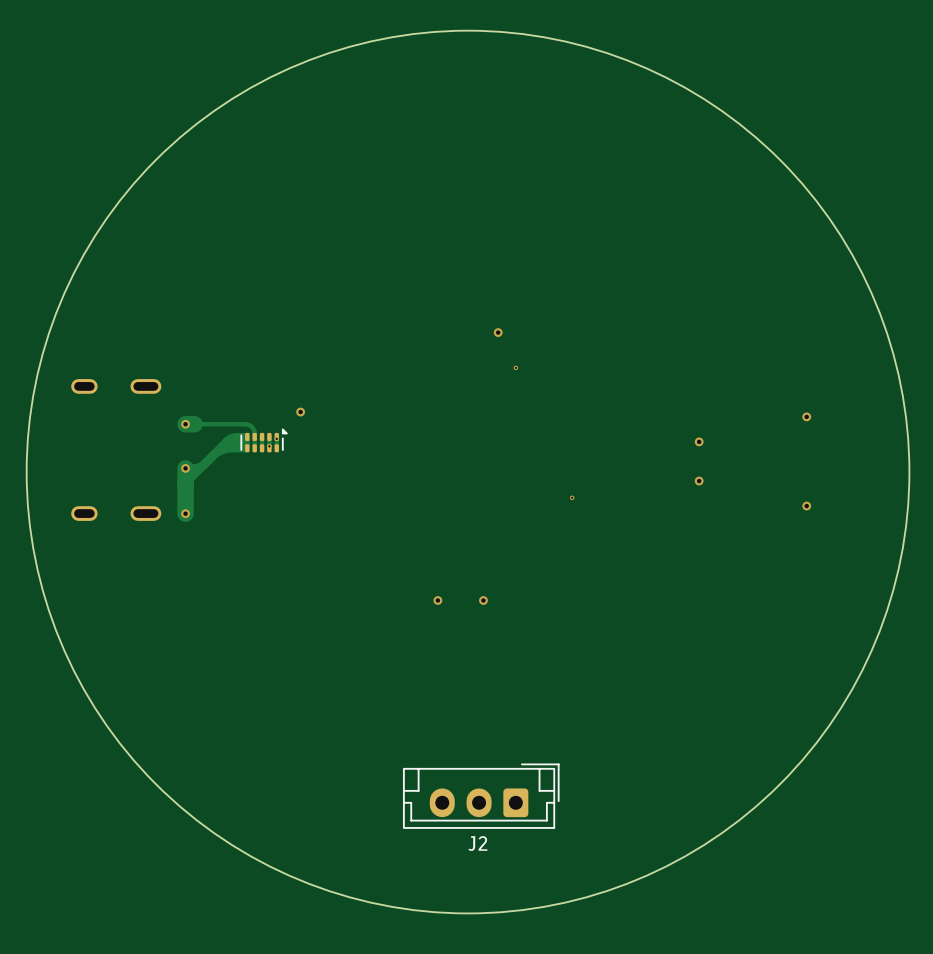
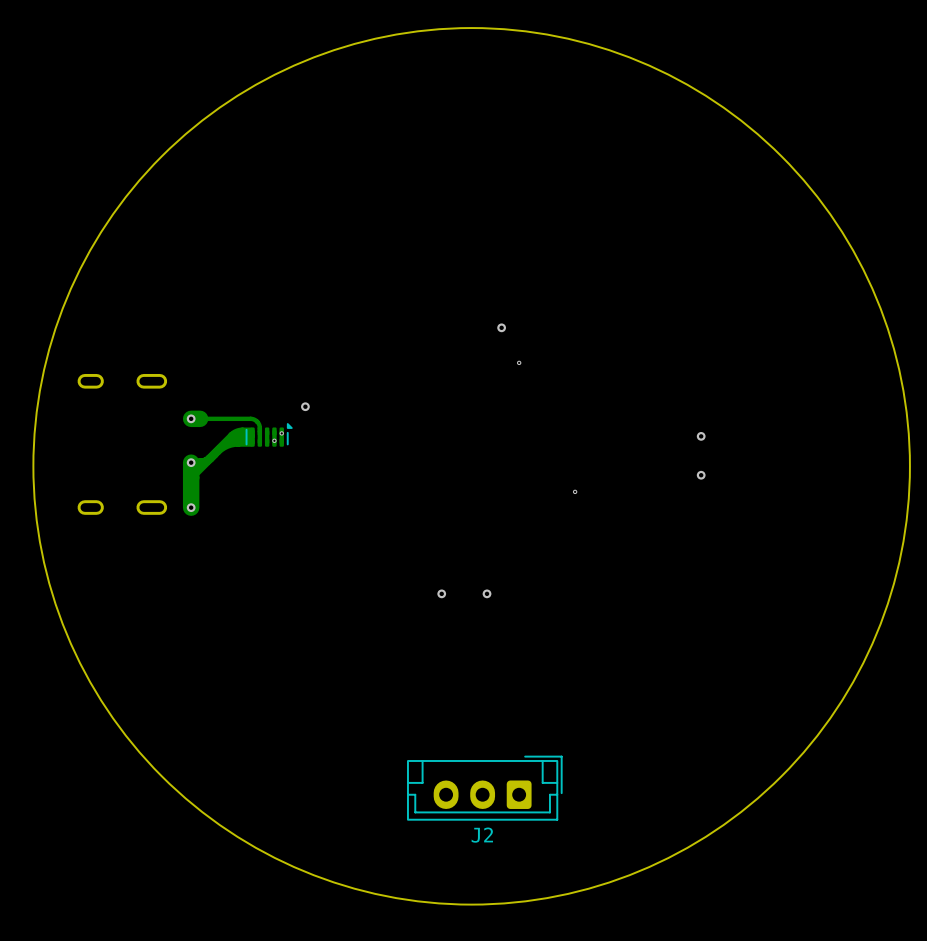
via: (806, 416) -> none
via: (806, 506) -> none

